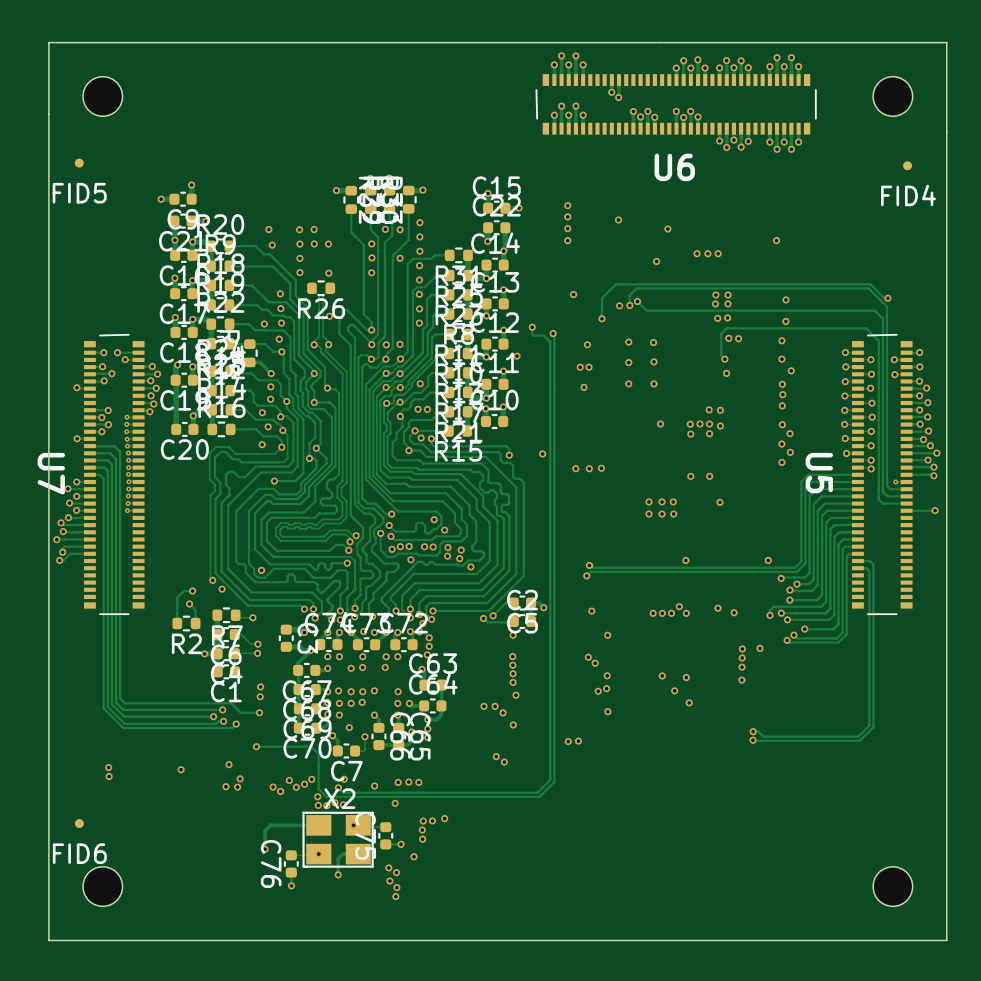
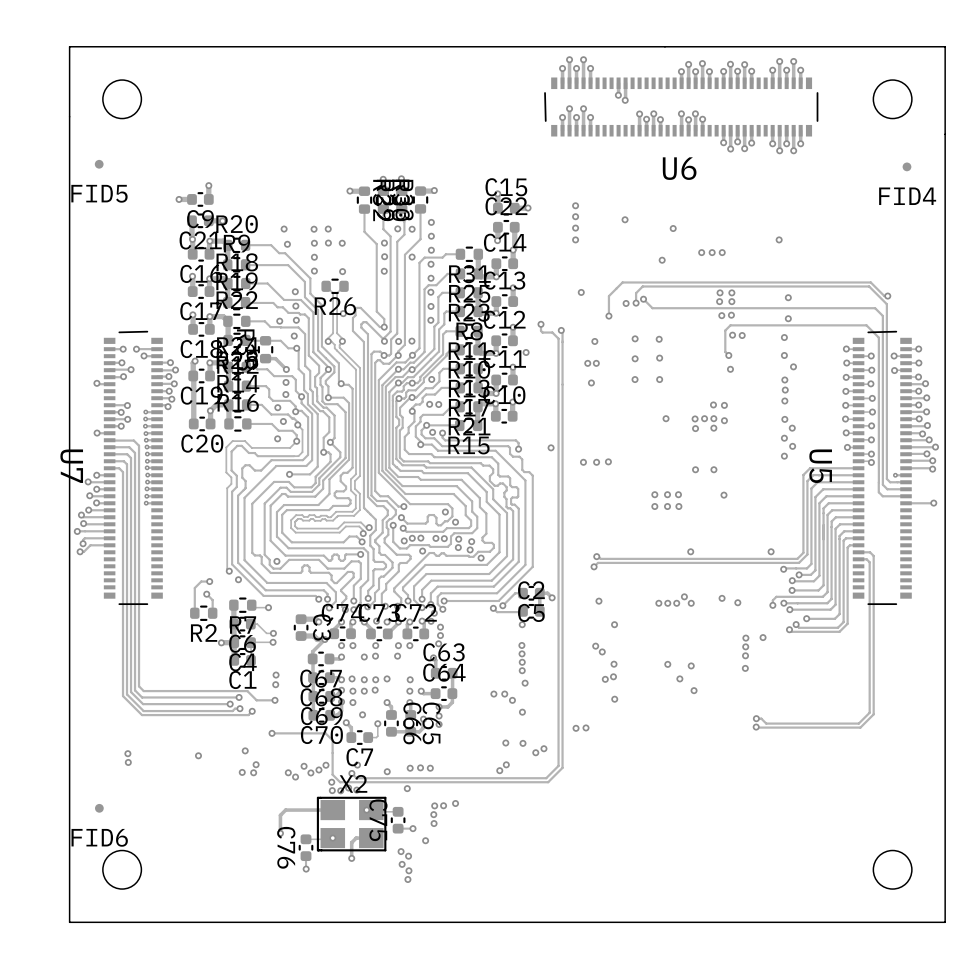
via: none -> (522, 743)
via: (504, 762) -> none
via: none -> (543, 748)
via: none -> (535, 752)
via: none -> (506, 764)
via: none -> (499, 770)

